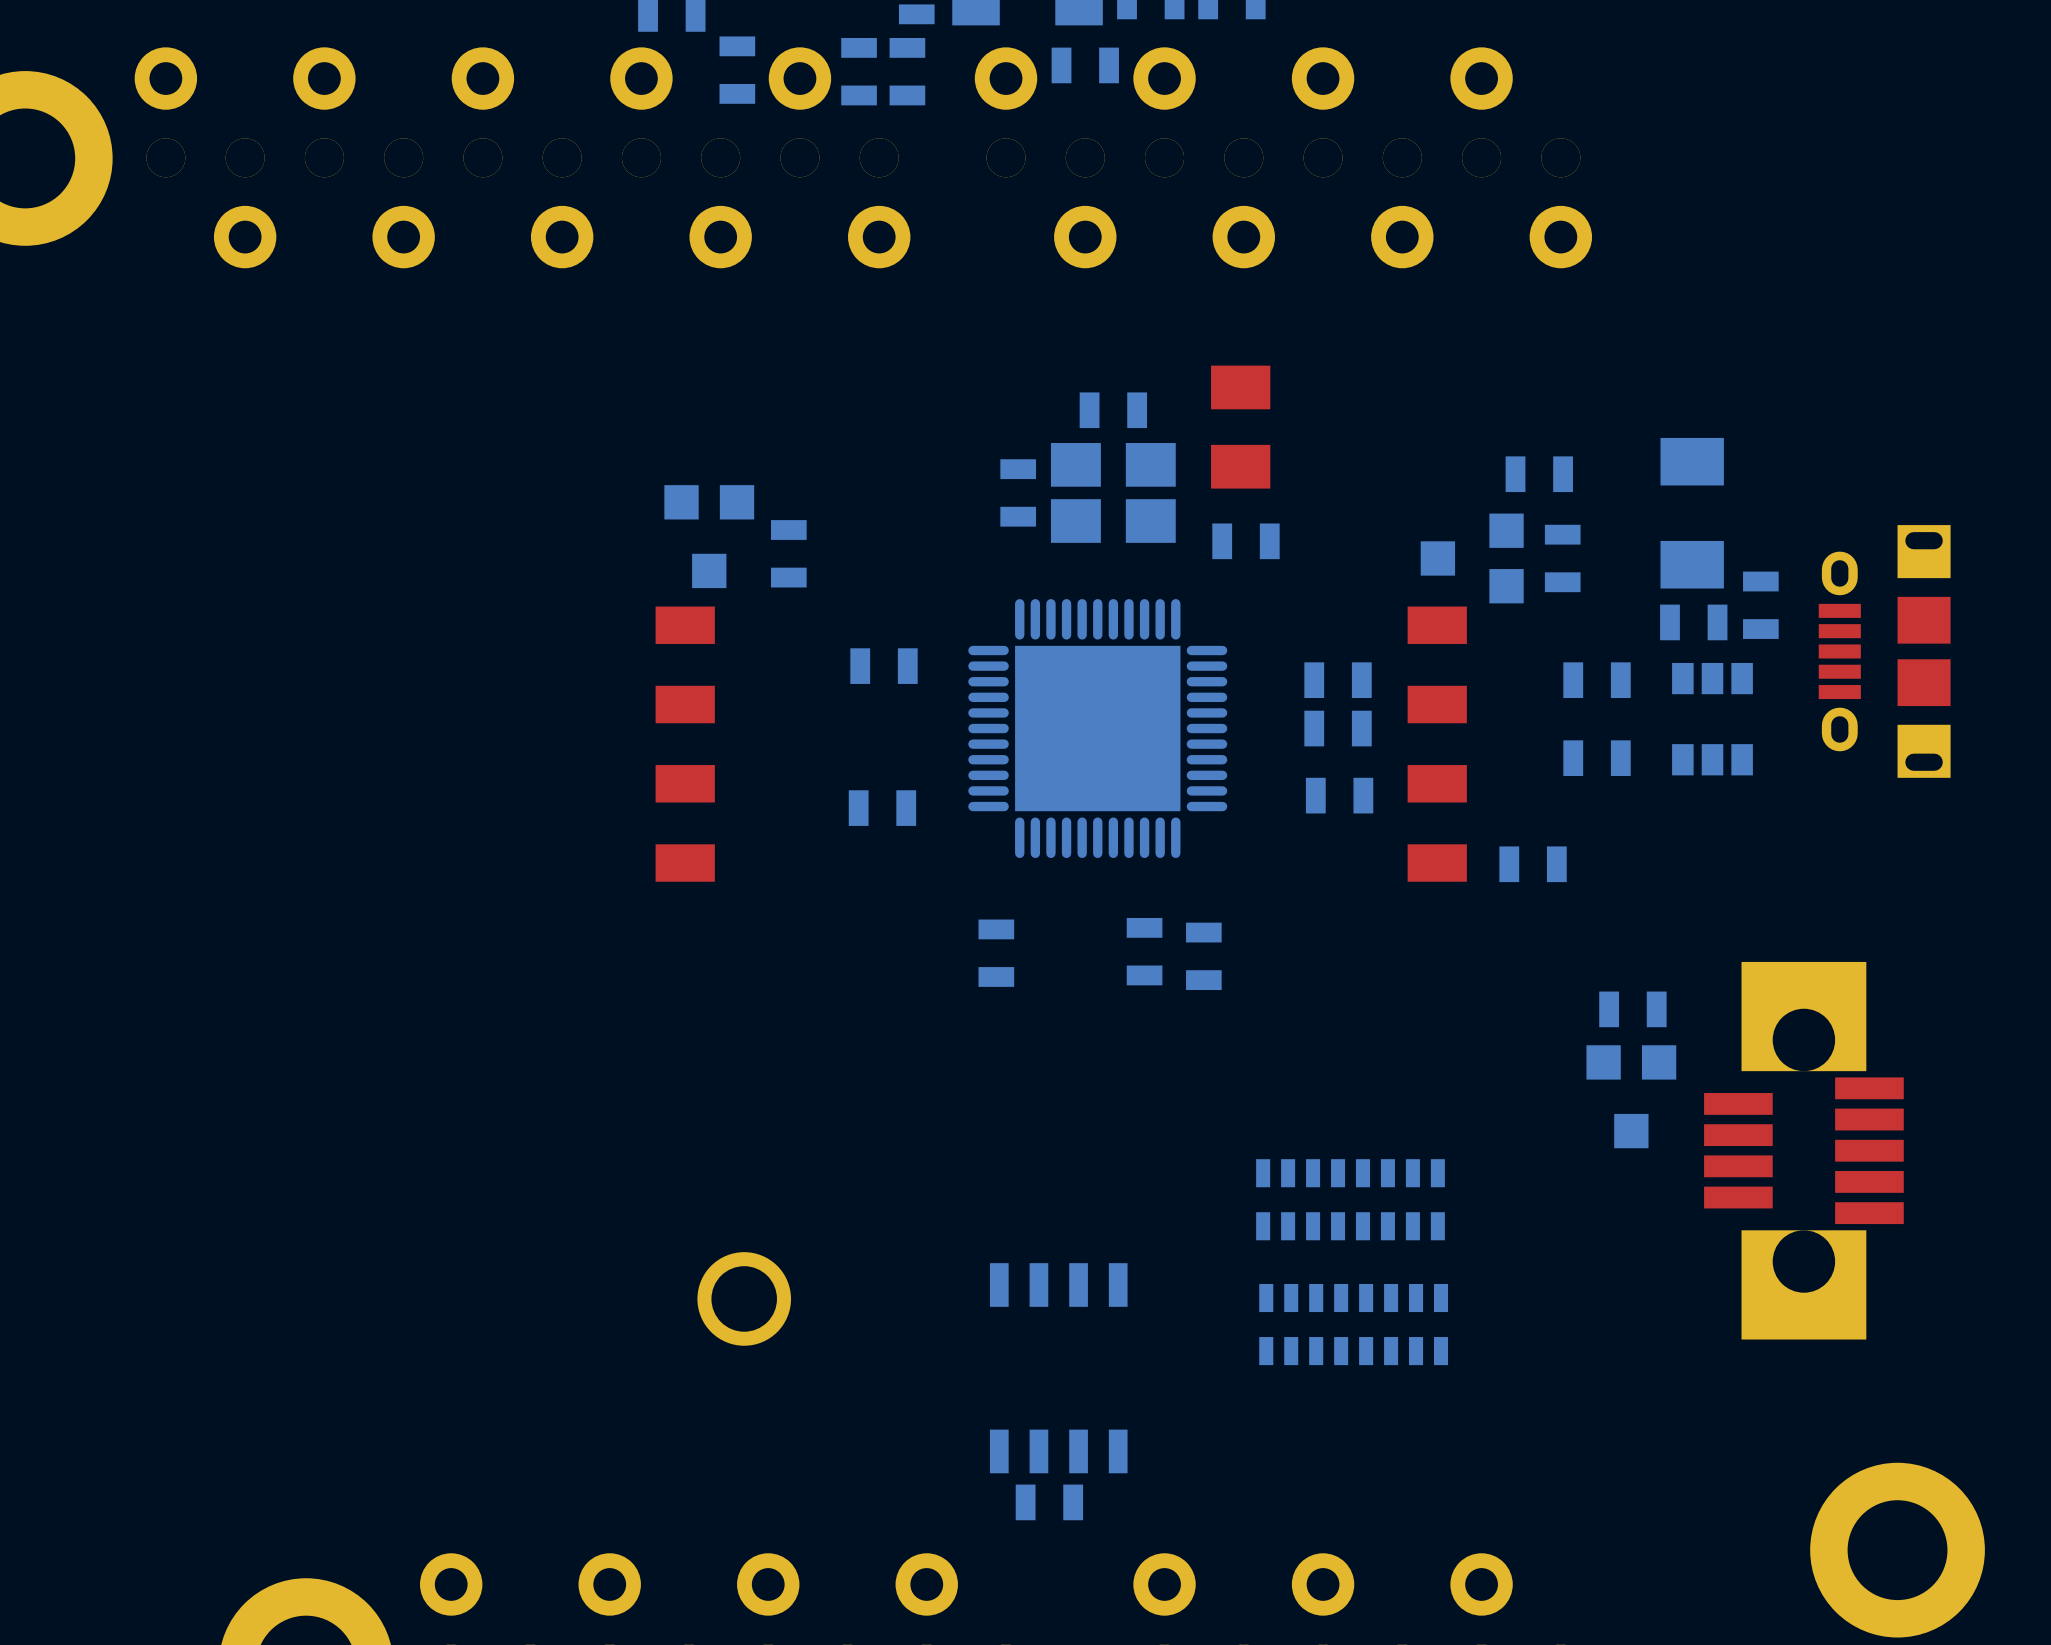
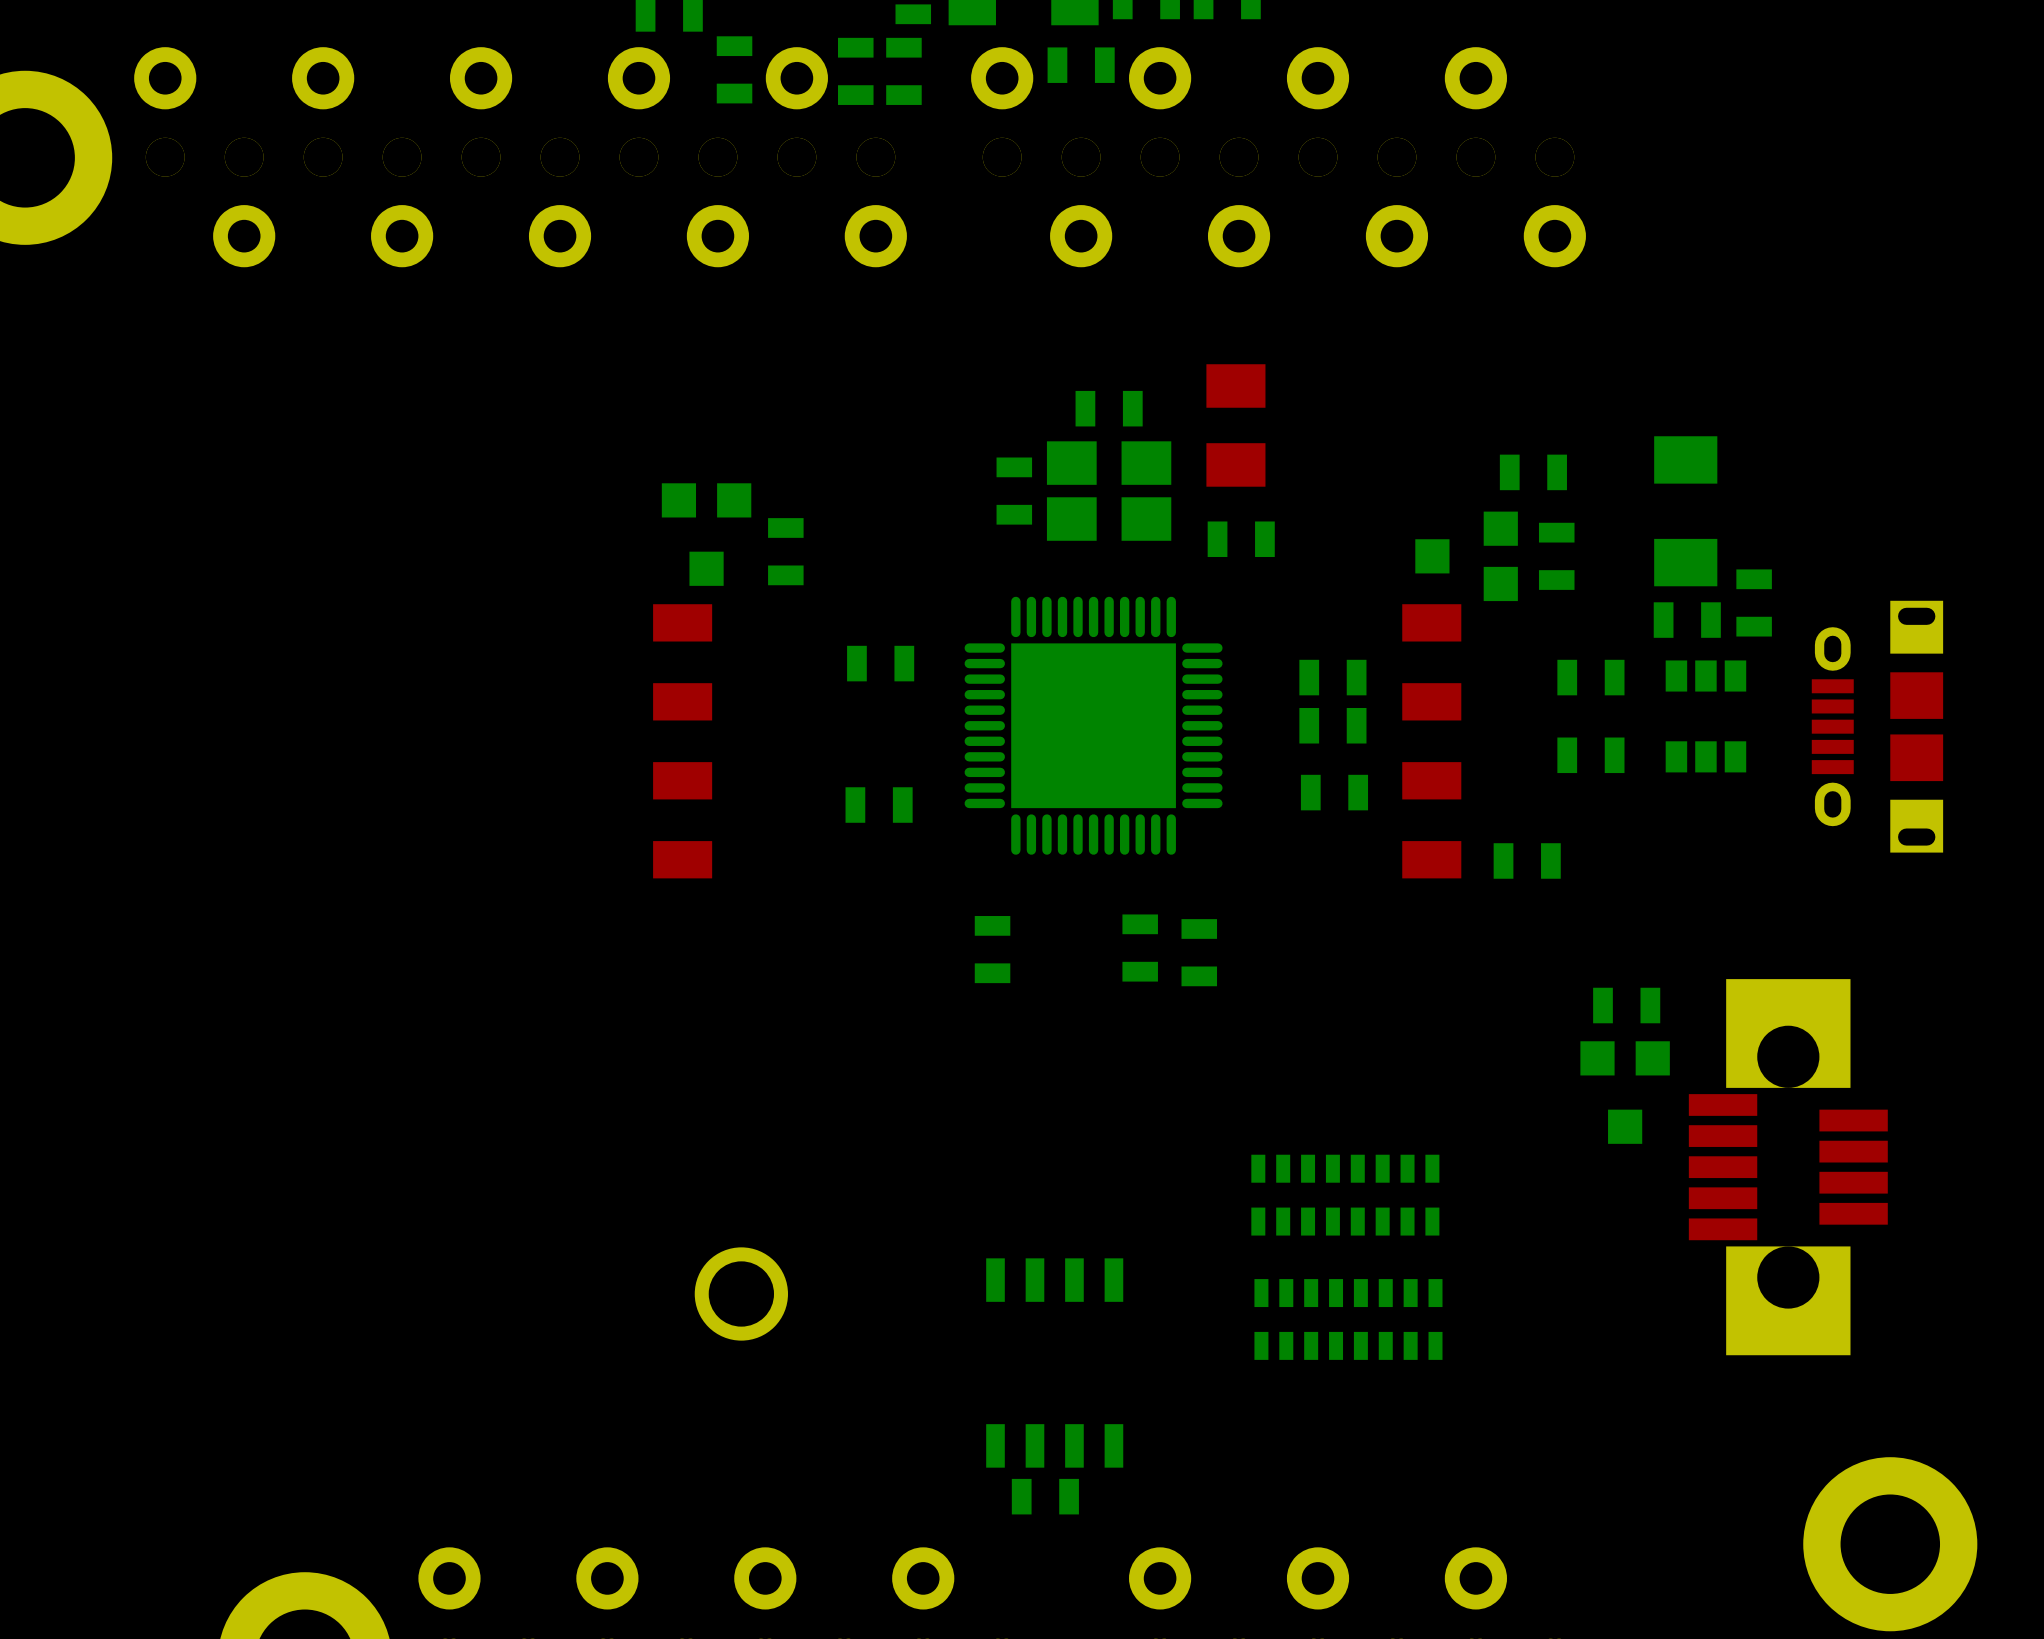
part position: (1884, 651) -> (1877, 726)
part rotation: 0° (1803, 1150) -> 180° (1788, 1167)

